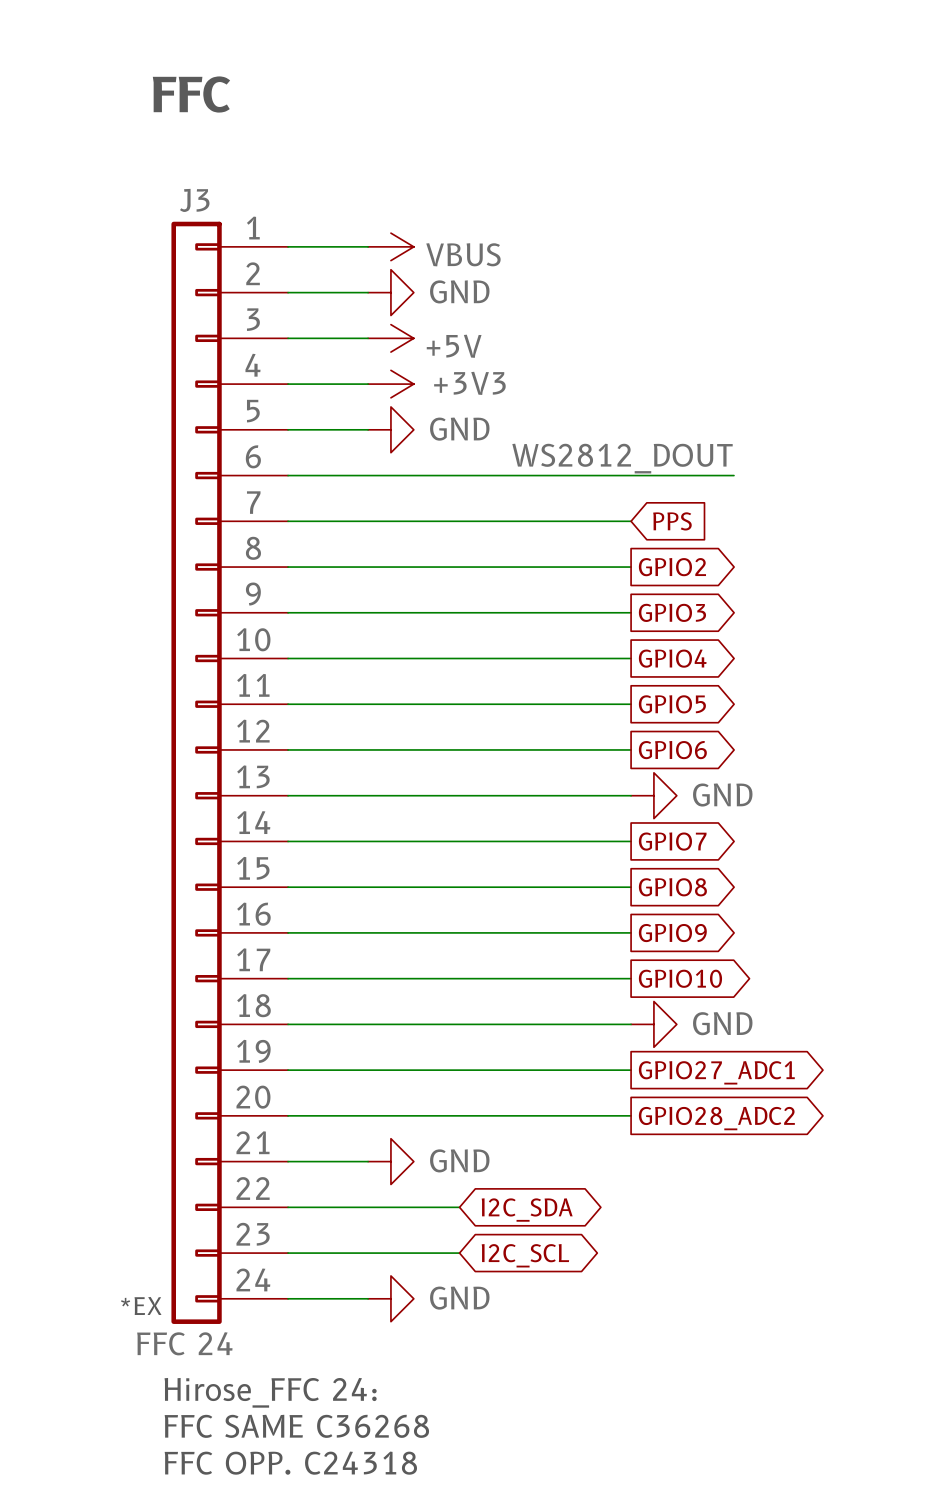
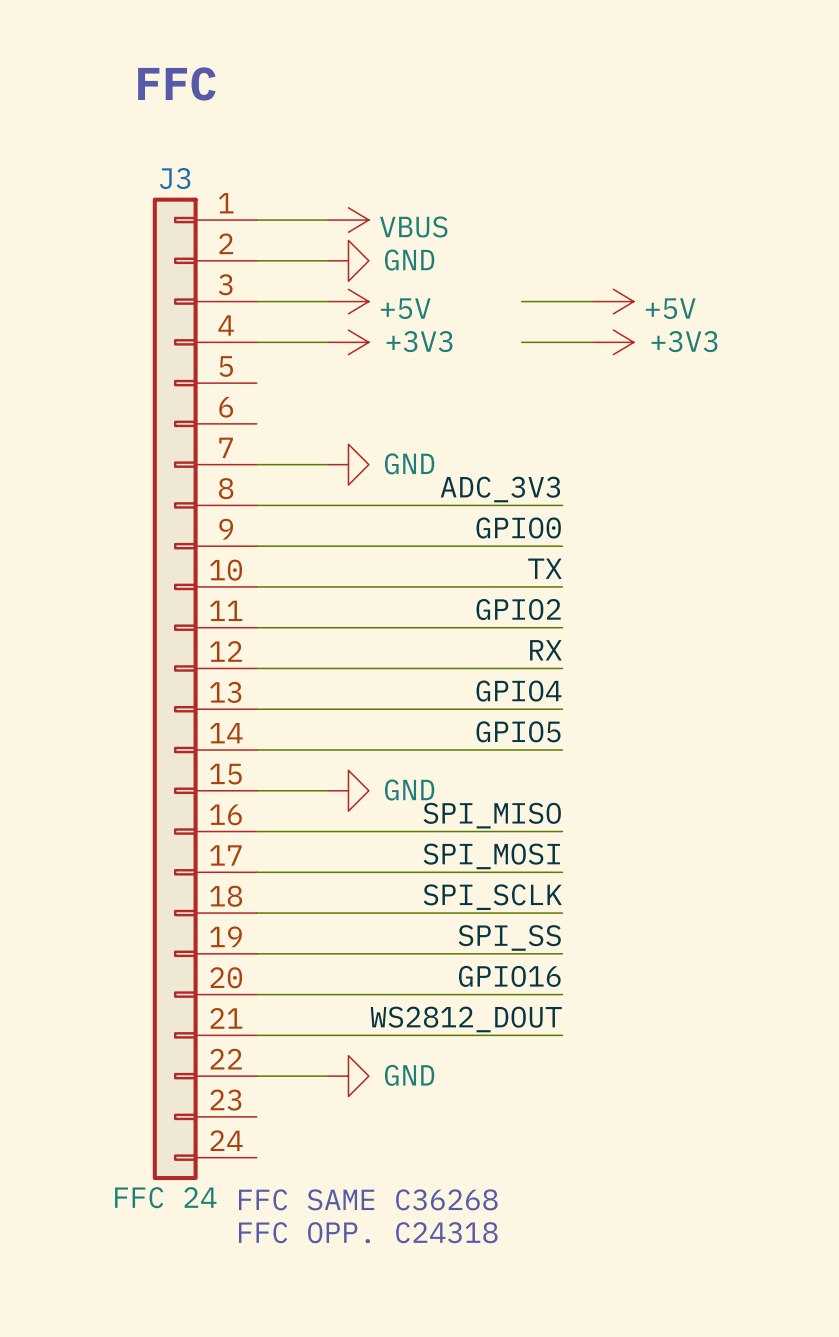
wire: none -> (521, 301) (593, 301)
power symbol: none -> +5V (613, 301)
power symbol: none -> +3V3 (613, 342)
wire: (288, 429) (368, 429) -> (521, 342) (593, 342)
power symbol position: GND (390, 429) -> GND (348, 464)
label: WS2812_DOUT (622, 458) -> none
wire: (288, 475) (733, 475) -> none
wire: (368, 521) (631, 521) -> none
global label: PPS (672, 521) -> none
label: none -> ADC_3V3 (500, 489)
global label: GPIO2 (672, 567) -> none
label: none -> GPIO0 (518, 527)
global label: GPIO3 (672, 612) -> none
label: none -> TX (544, 568)
global label: GPIO4 (672, 658) -> none
label: none -> GPIO2 (518, 609)
global label: GPIO5 (672, 704) -> none
label: none -> RX (545, 650)
global label: GPIO6 (672, 750) -> none
label: none -> GPIO4 (518, 691)
power symbol: GND (653, 795) -> none
label: none -> GPIO5 (518, 731)
global label: GPIO7 (672, 841) -> none
wire: (368, 887) (631, 887) -> (328, 1035) (562, 1035)
power symbol: none -> GND (348, 790)
global label: GPIO8 (672, 887) -> none
label: none -> SPI_MISO (492, 815)
global label: GPIO9 (672, 933) -> none
label: none -> SPI_MOSI (491, 856)
global label: GPIO10 (680, 978) -> none
label: none -> SPI_SCLK (492, 897)
power symbol: GND (653, 1024) -> none
label: none -> SPI_SS (509, 937)
global label: GPIO27_ADC1 (716, 1072) -> none
label: none -> GPIO16 (509, 976)
global label: GPIO28_ADC2 (716, 1118) -> none
label: none -> WS2812_DOUT (466, 1019)
power symbol: GND (390, 1161) -> none
wire: (368, 1207) (459, 1207) -> none
power symbol: none -> GND (348, 1076)
global label: I2C_SDA (527, 1210) -> none
wire: (288, 1253) (459, 1253) -> none
global label: I2C_SCL (525, 1255) -> none
wire: (288, 1298) (368, 1298) -> none
power symbol: GND (390, 1298) -> none
text: *EX (141, 1305) -> none
text: Hirose_FFC 24: (270, 1392) -> none
text position: FFC SAME C36268 (296, 1426) -> FFC SAME C36268 (368, 1199)
text position: FFC OPP. C24318 (290, 1463) -> FFC OPP. C24318 (368, 1232)

